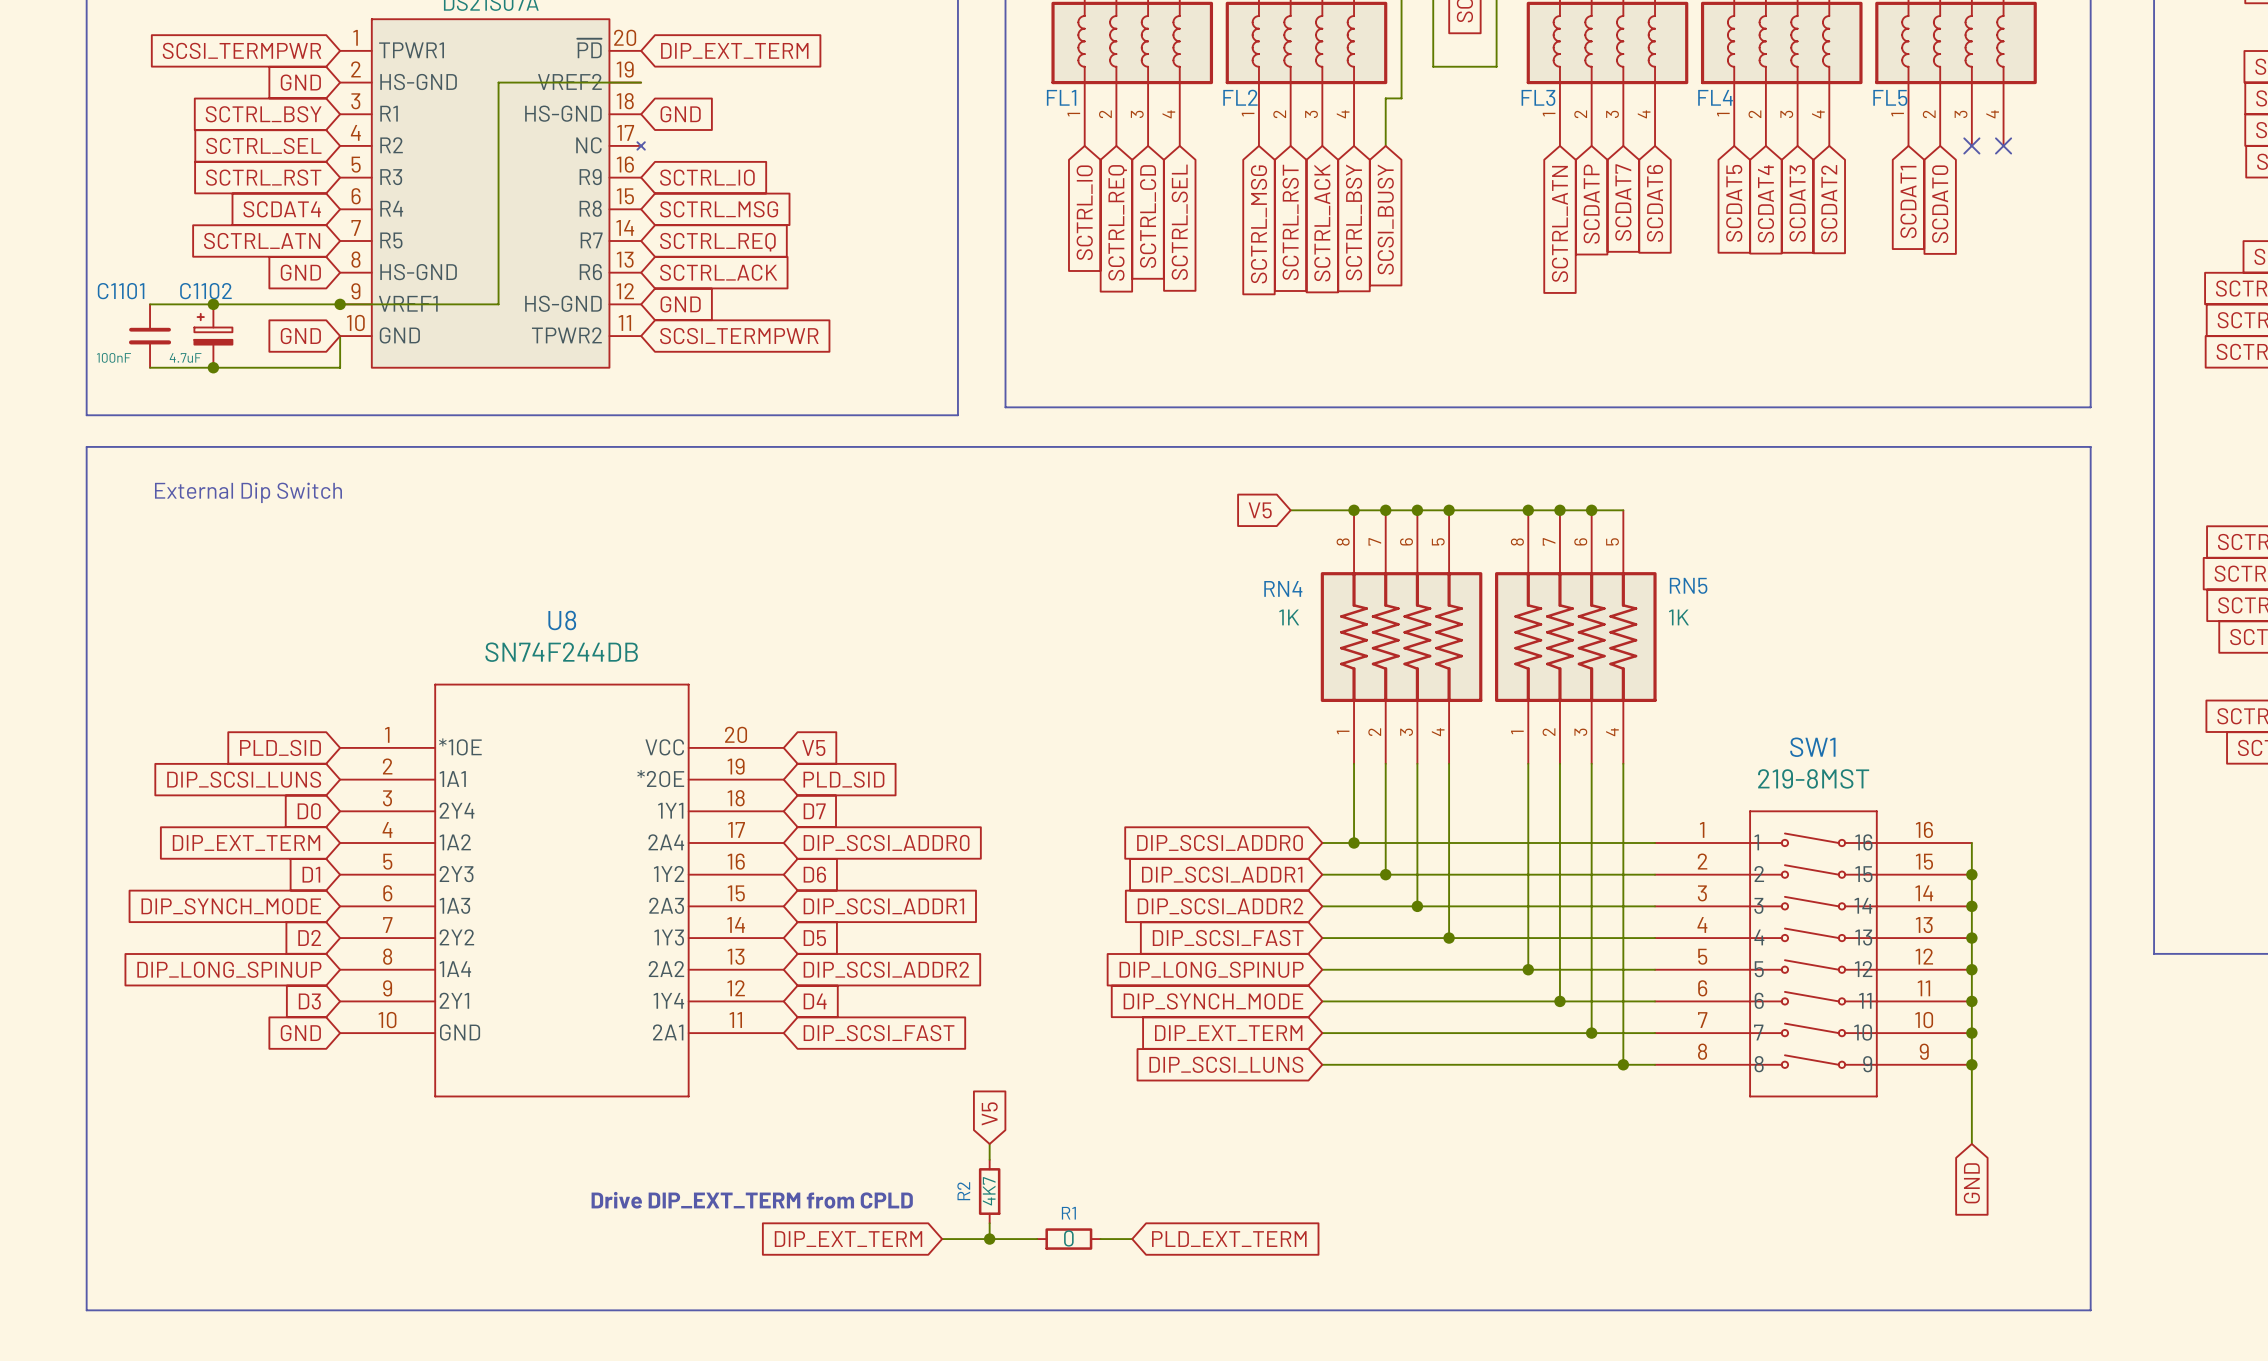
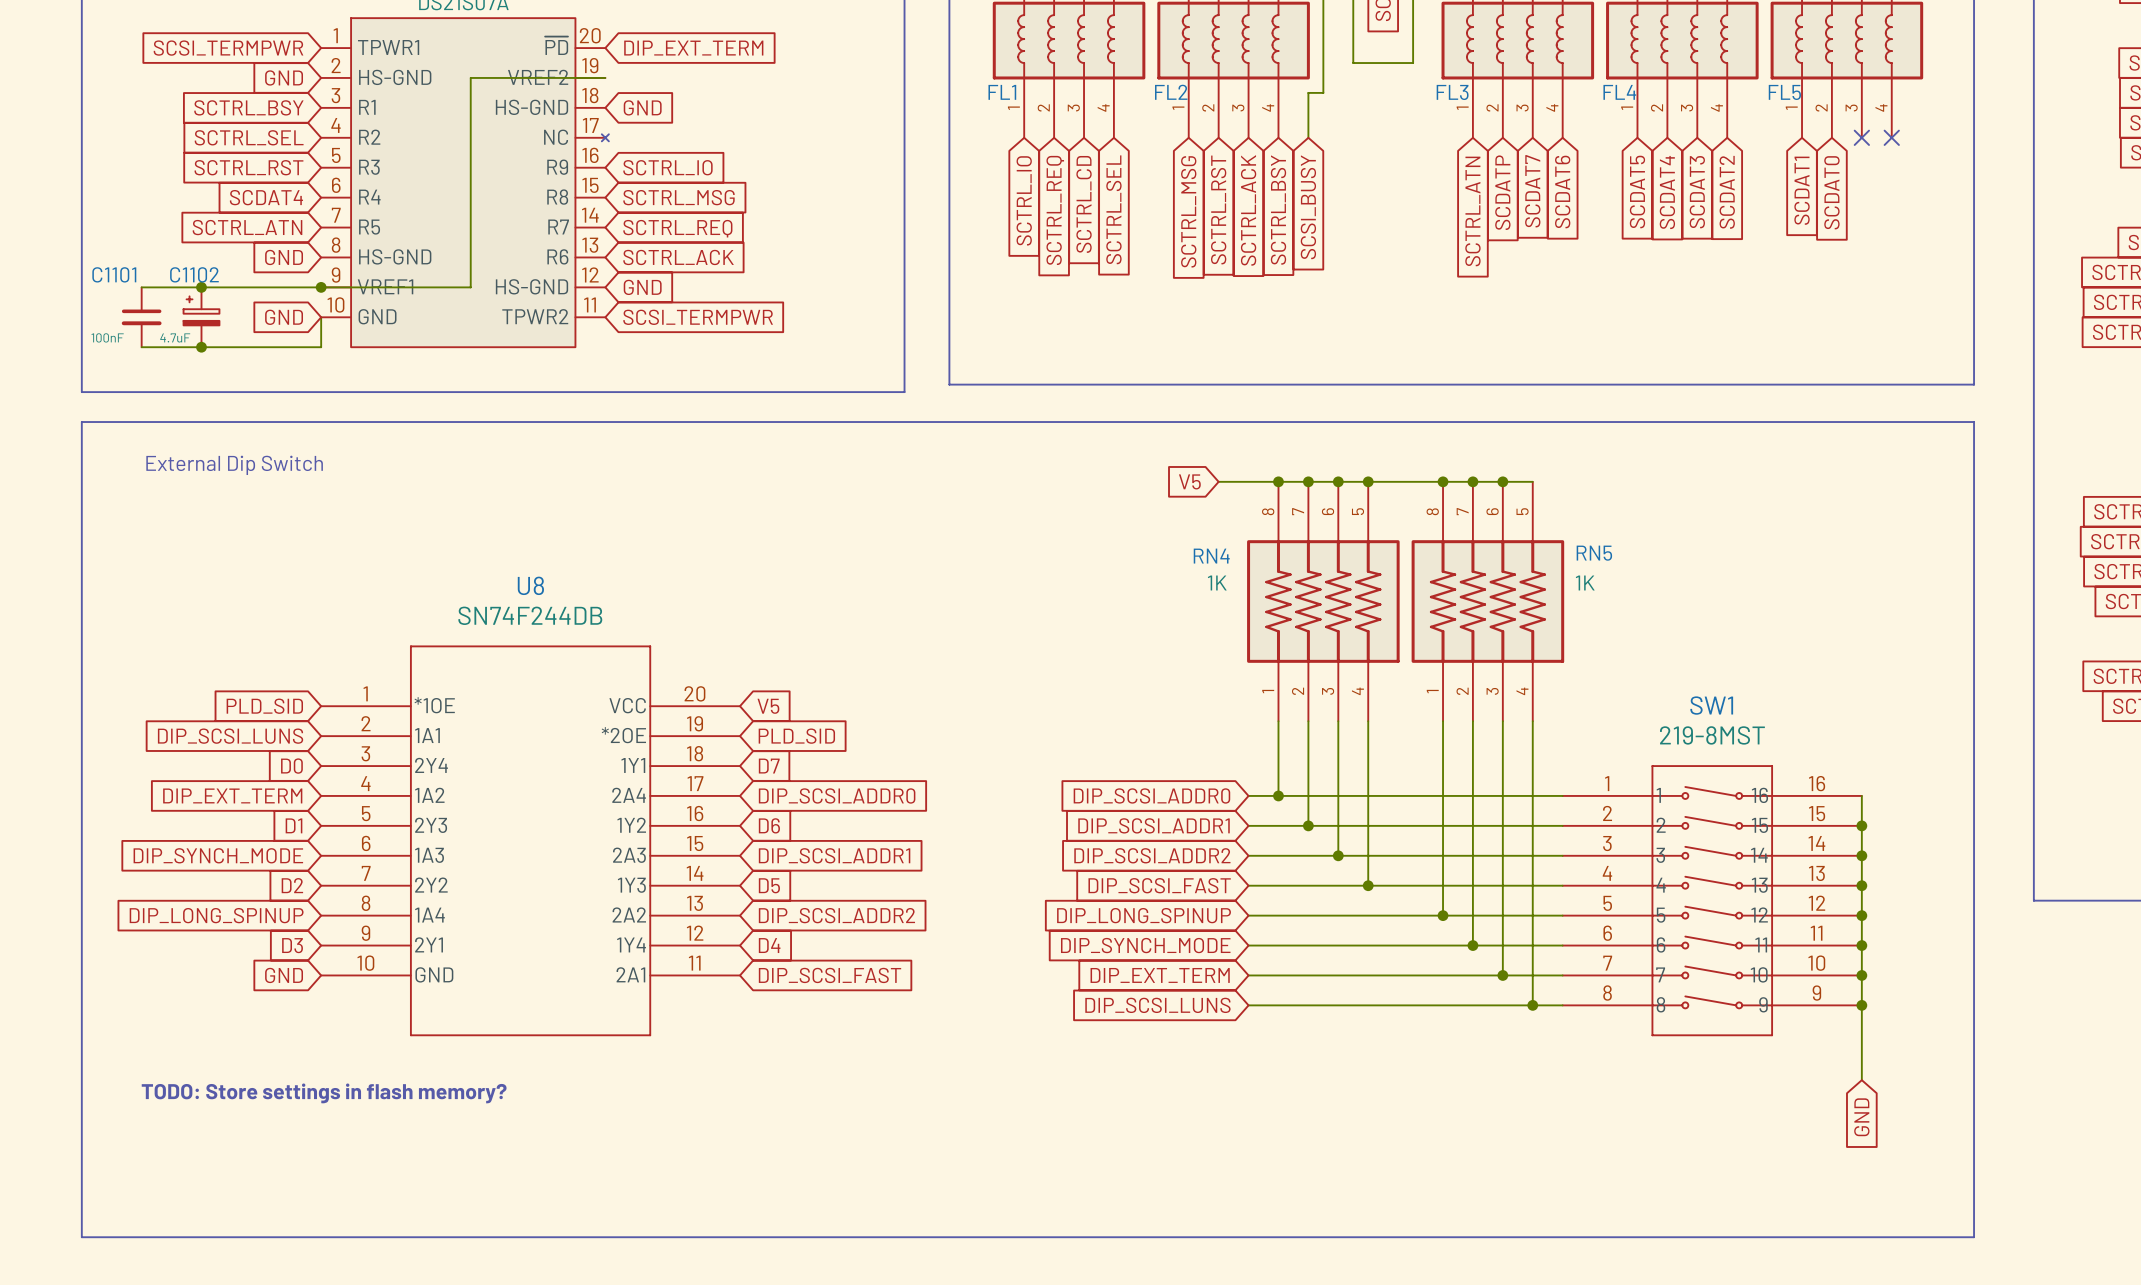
global label: V5 (989, 1113) -> none
wire: (989, 1143) (989, 1159) -> none
text: none -> TODO: Store settings in flash memory? (324, 1093)
R2: 4K7 (989, 1191) -> none
text: Drive DIP_EXT_TERM from CPLD (752, 1200) -> none
wire: (989, 1223) (989, 1239) -> none
global label: DIP_EXT_TERM (848, 1239) -> none
wire: (942, 1239) (1037, 1239) -> none
junction: (989, 1239) -> none
R1: 0 (1068, 1239) -> none
wire: (1100, 1239) (1132, 1239) -> none
global label: PLD_EXT_TERM (1229, 1239) -> none

